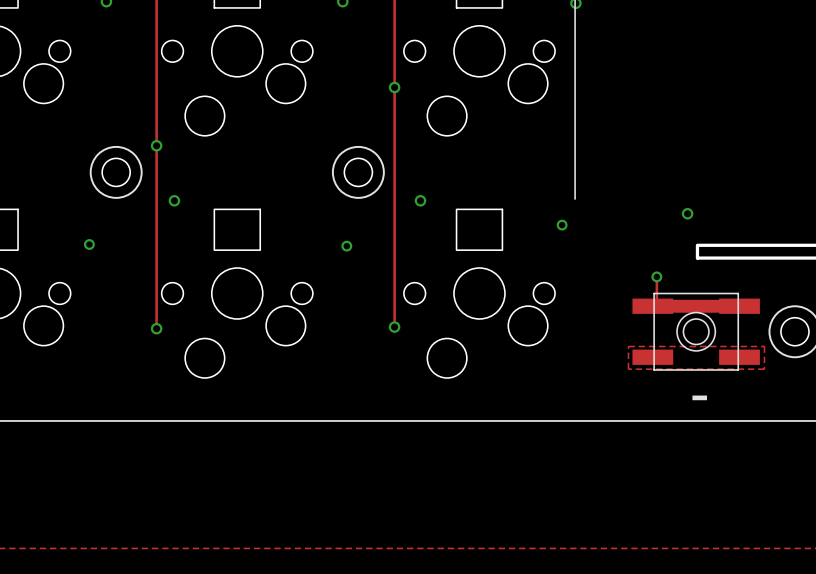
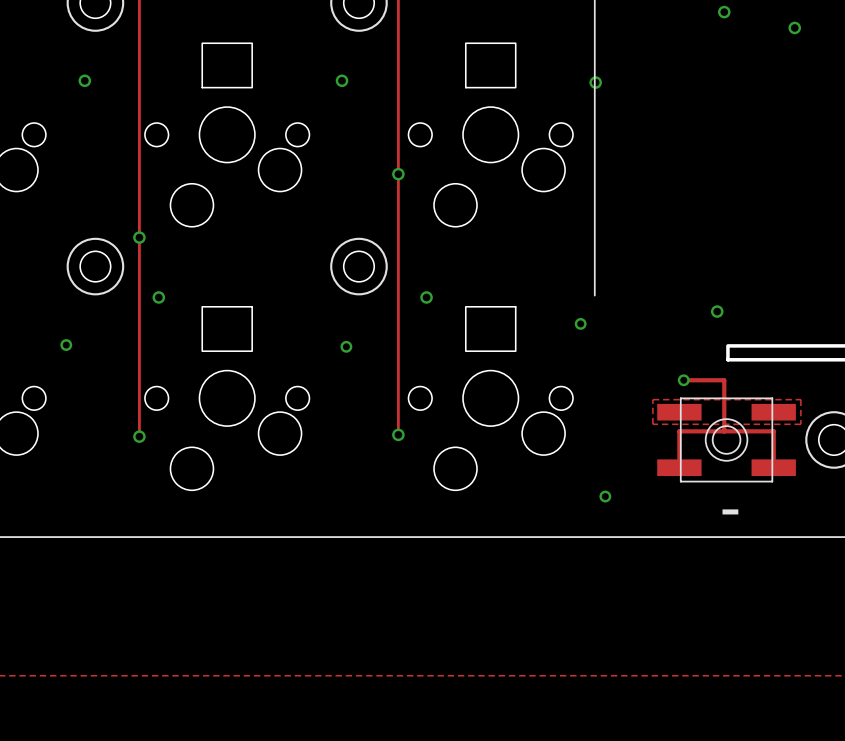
track: (656, 276) (656, 302) (652, 306) (739, 306) -> (683, 380) (724, 380) (724, 431)
zone outline: (628, 346) (764, 346) (764, 369) (628, 369) (628, 346) -> (652, 399) (800, 399) (800, 424) (652, 424) (652, 399)
track: none -> (679, 467) (679, 431) (773, 431) (773, 467)
via: none -> (605, 496)

